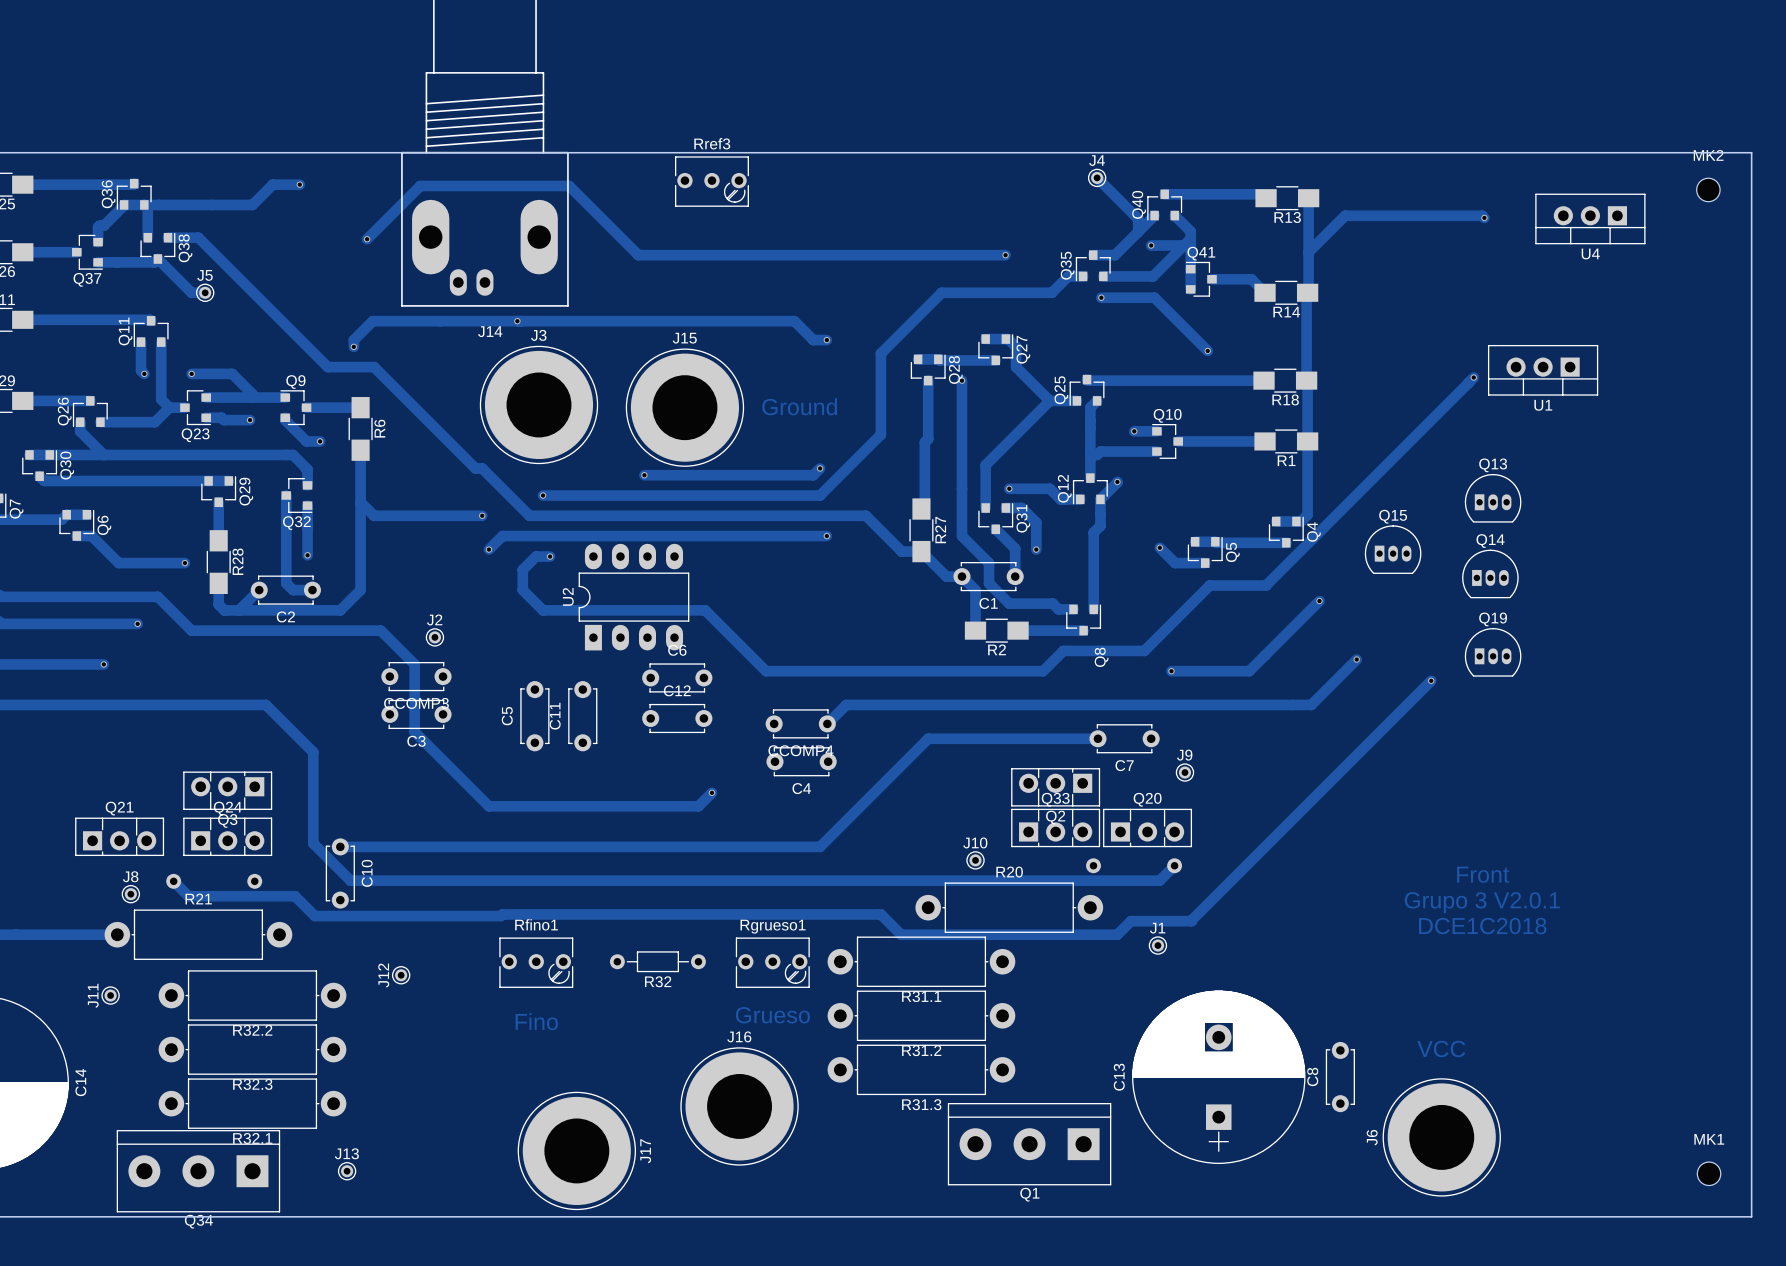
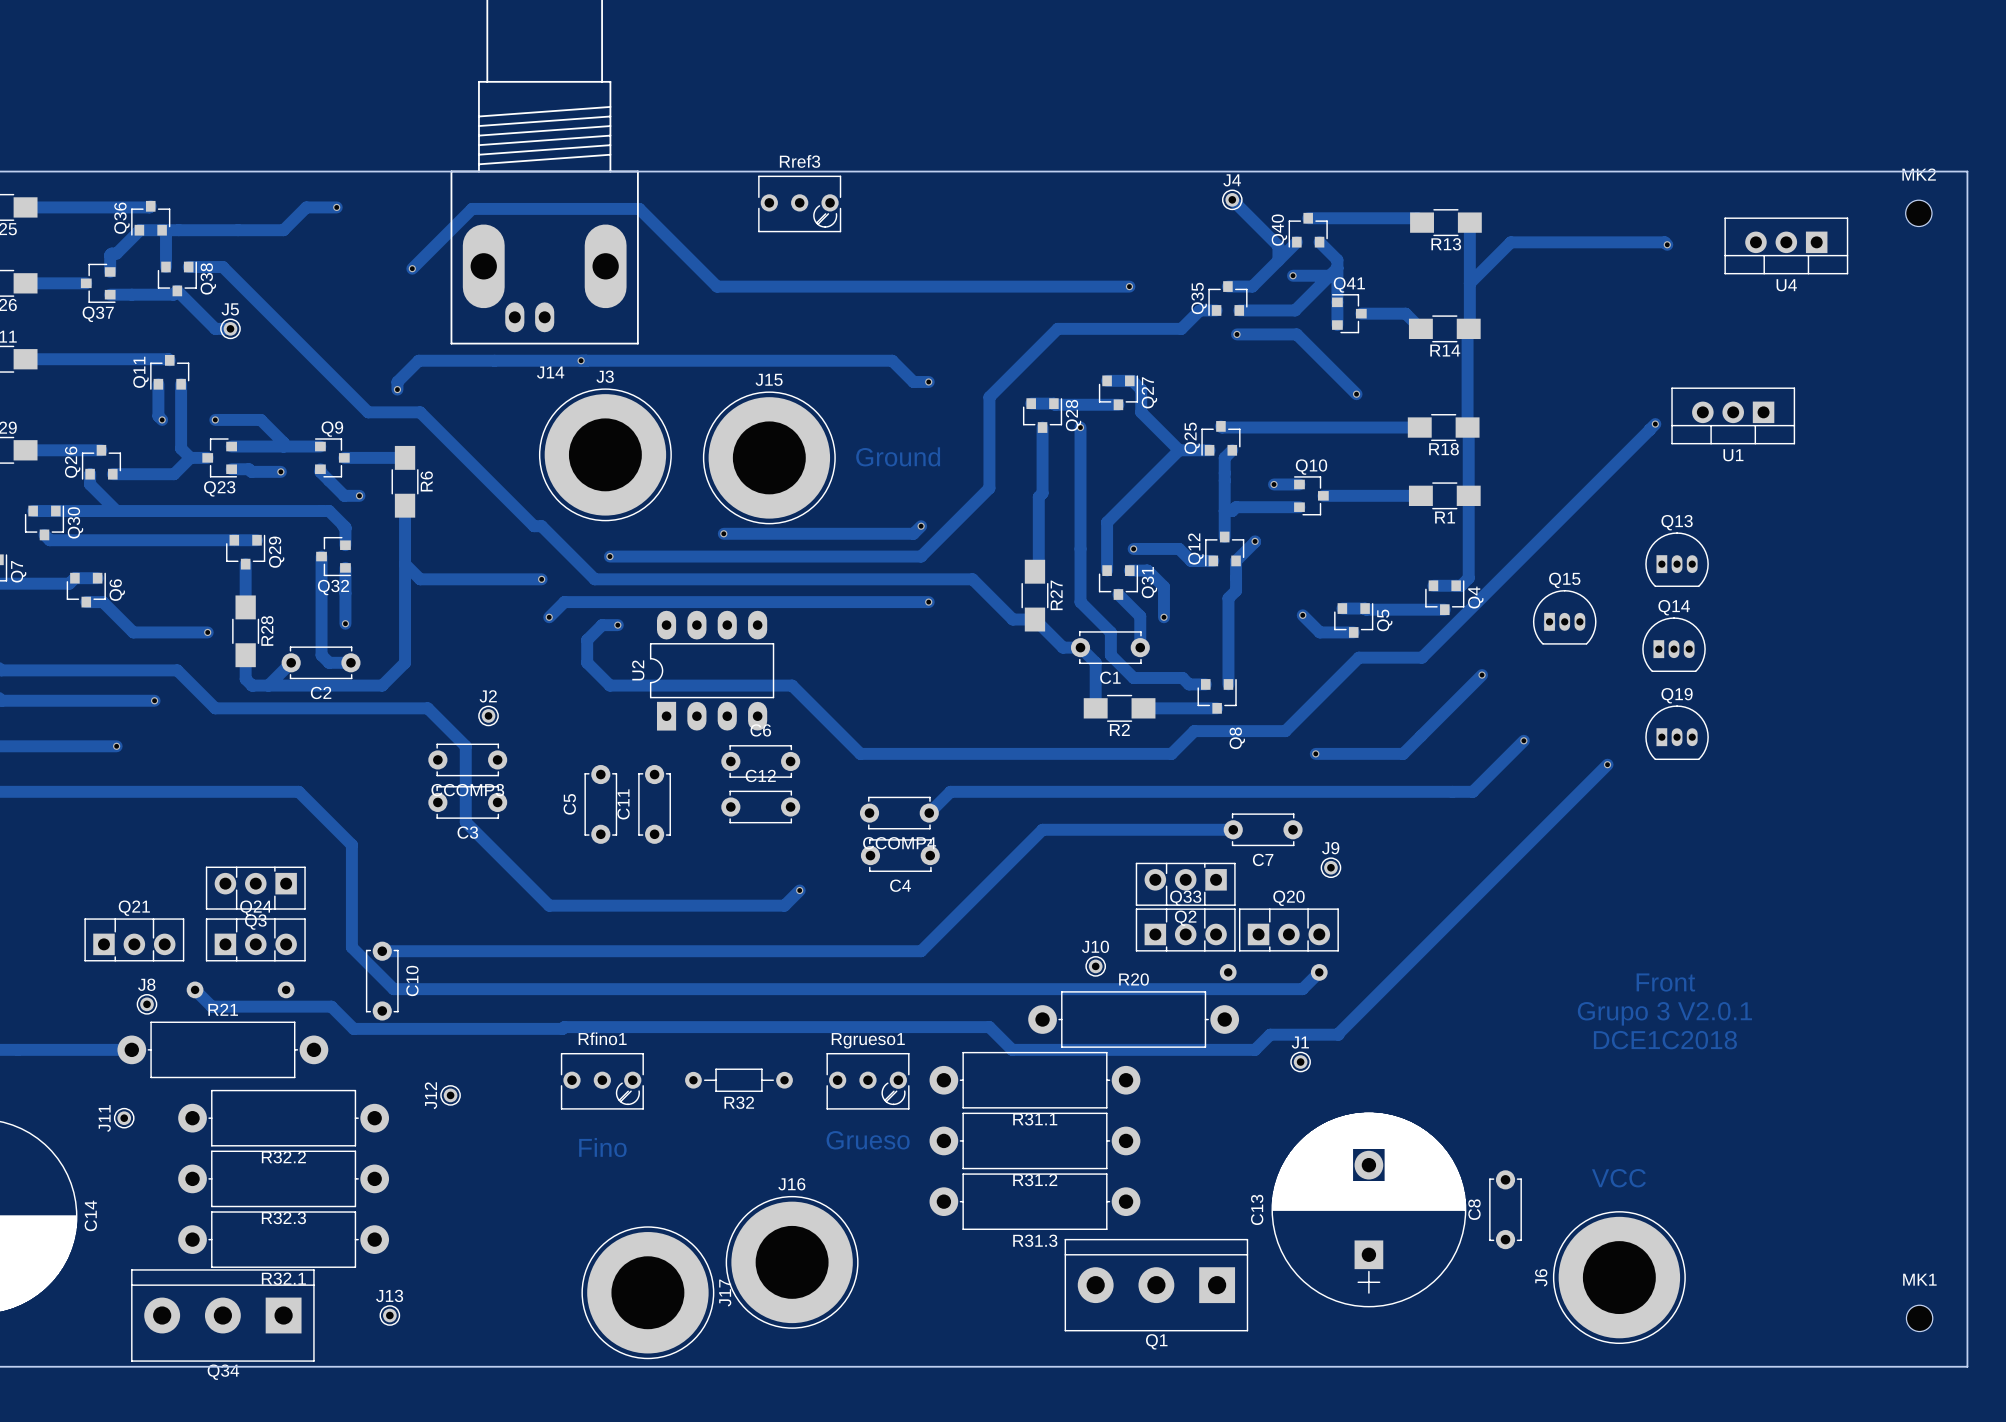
J16 position: (739, 1106) -> (792, 1262)

